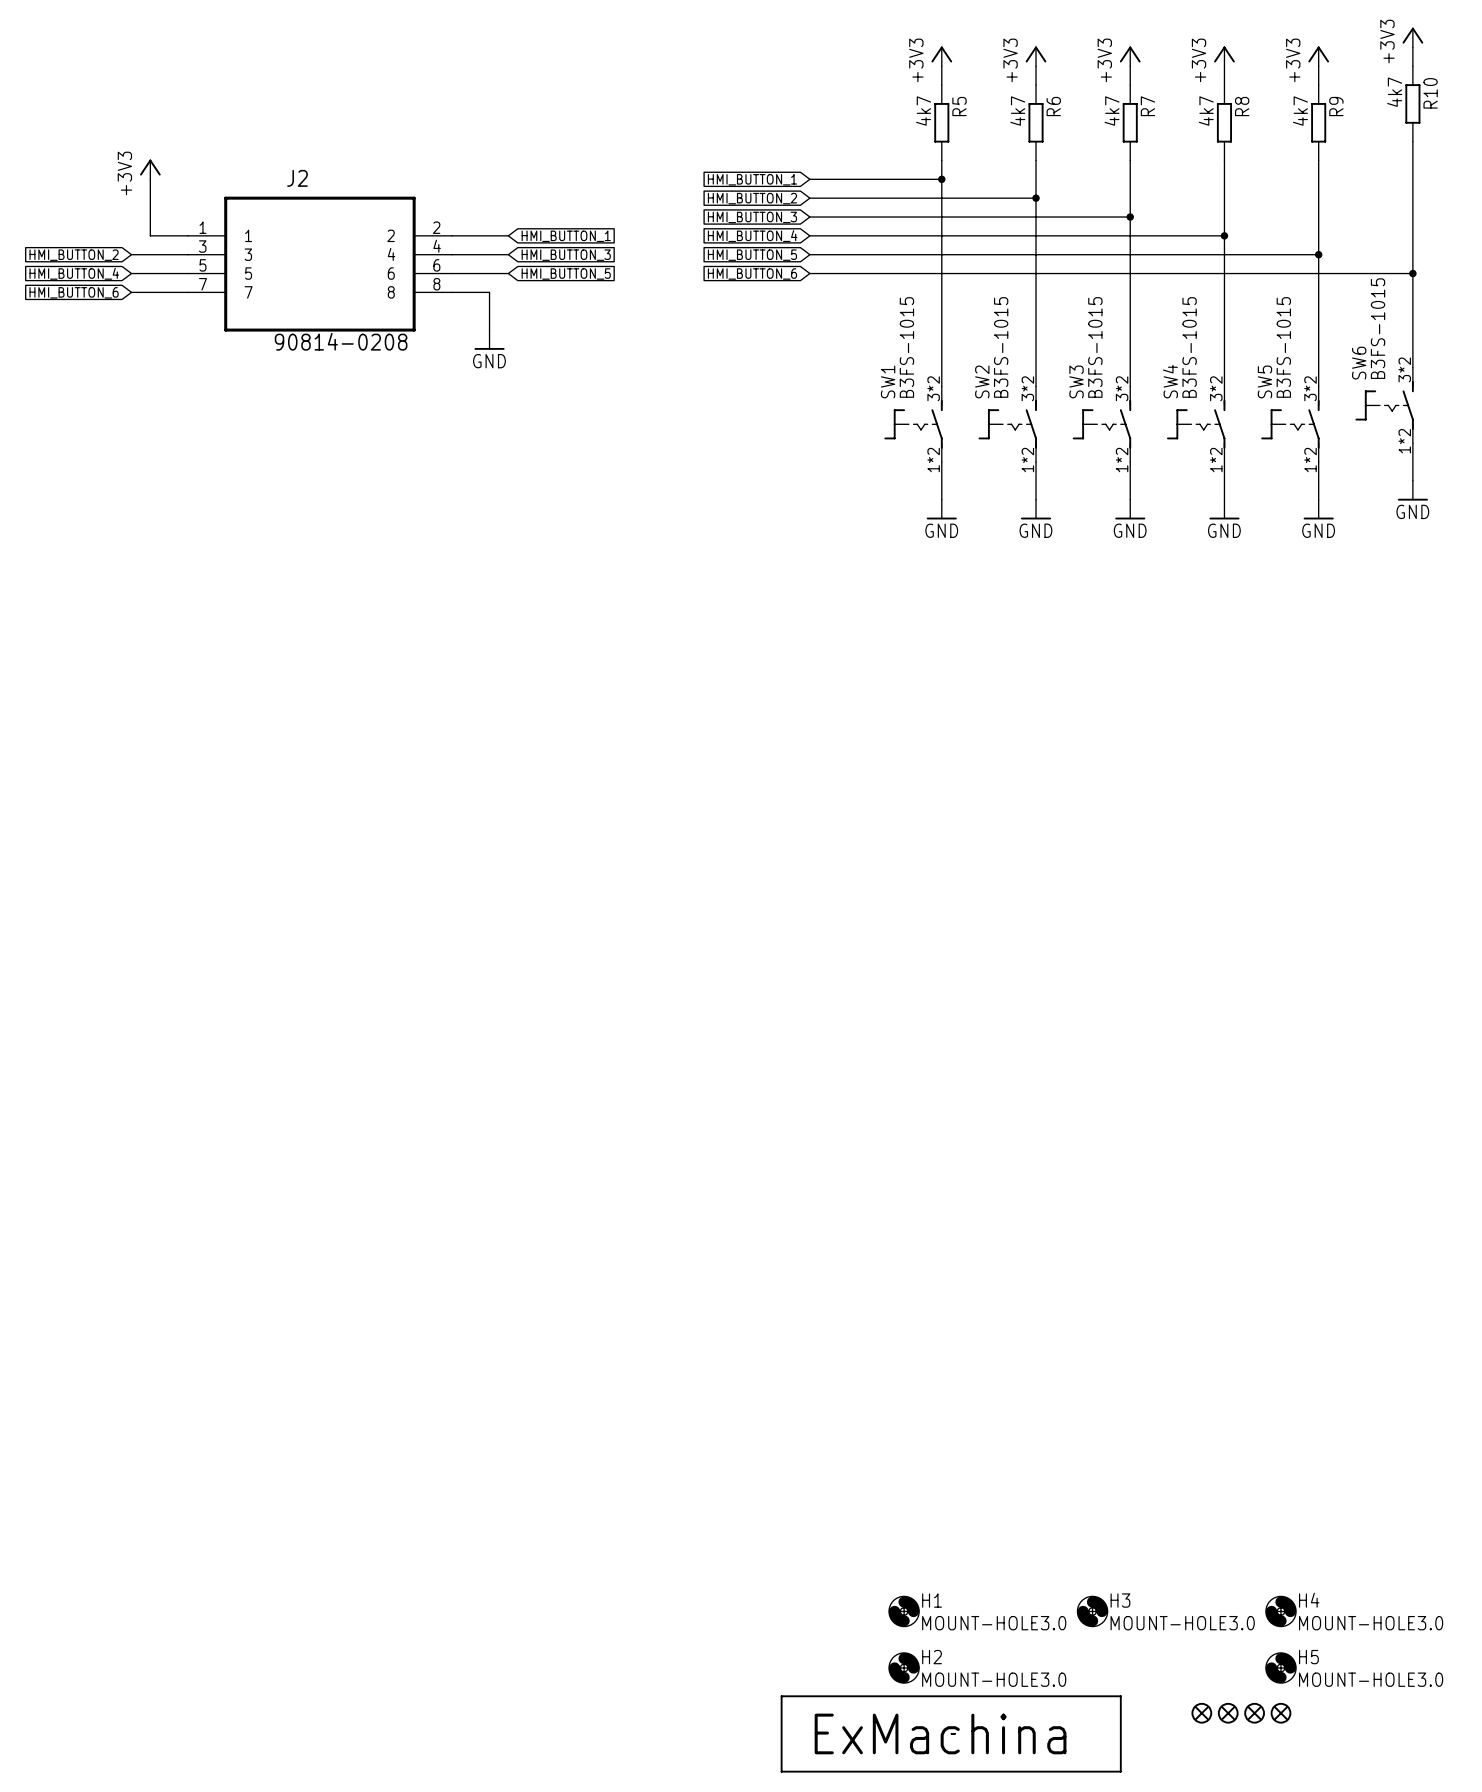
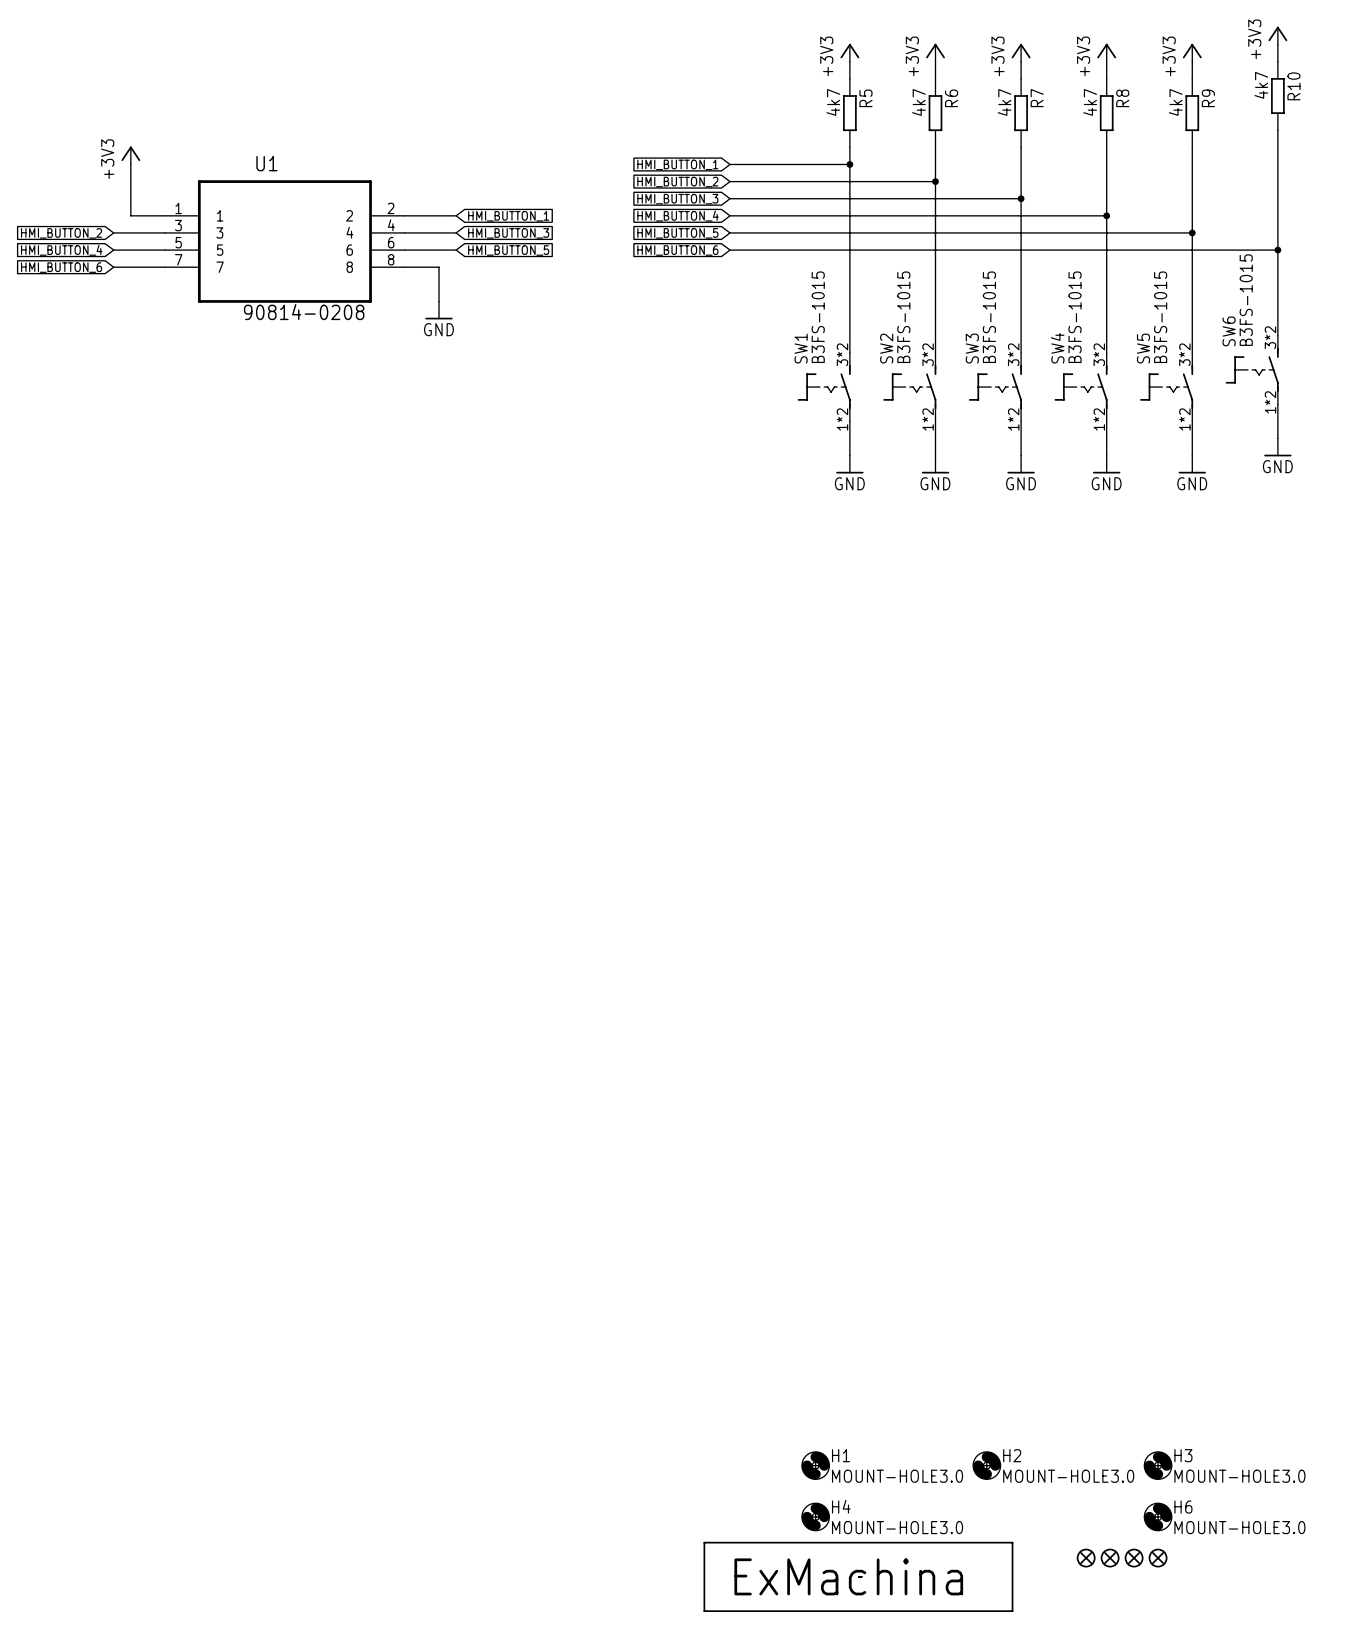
J2 name: J2 (297, 178) -> U1 (266, 163)
H3 name: H3 (1120, 1600) -> H2 (1012, 1455)
H4 name: H4 (1309, 1600) -> H3 (1183, 1455)
H2 name: H2 (932, 1657) -> H4 (841, 1506)
H5 name: H5 (1308, 1657) -> H6 (1183, 1507)

